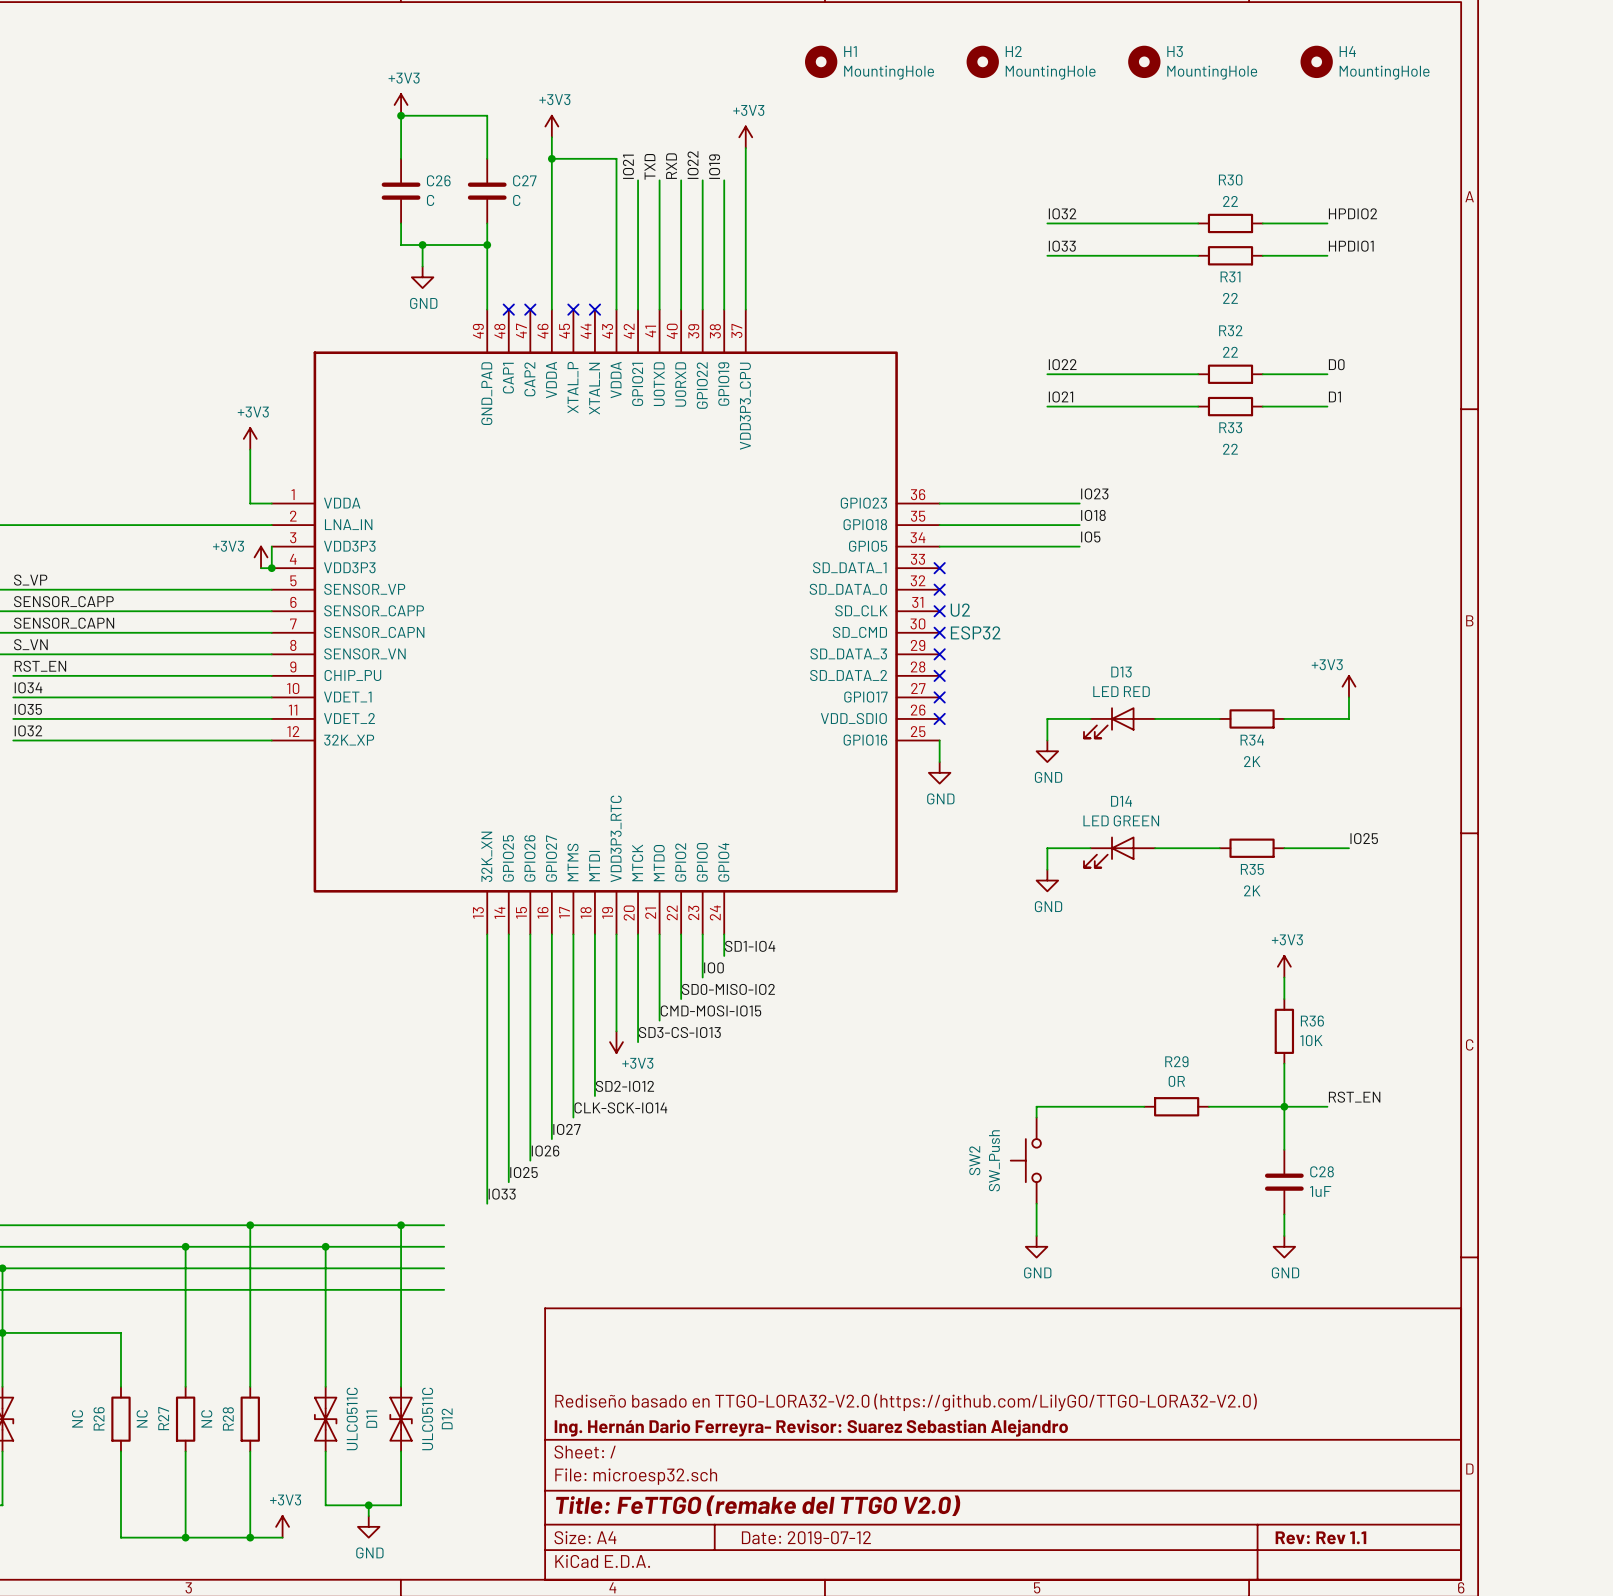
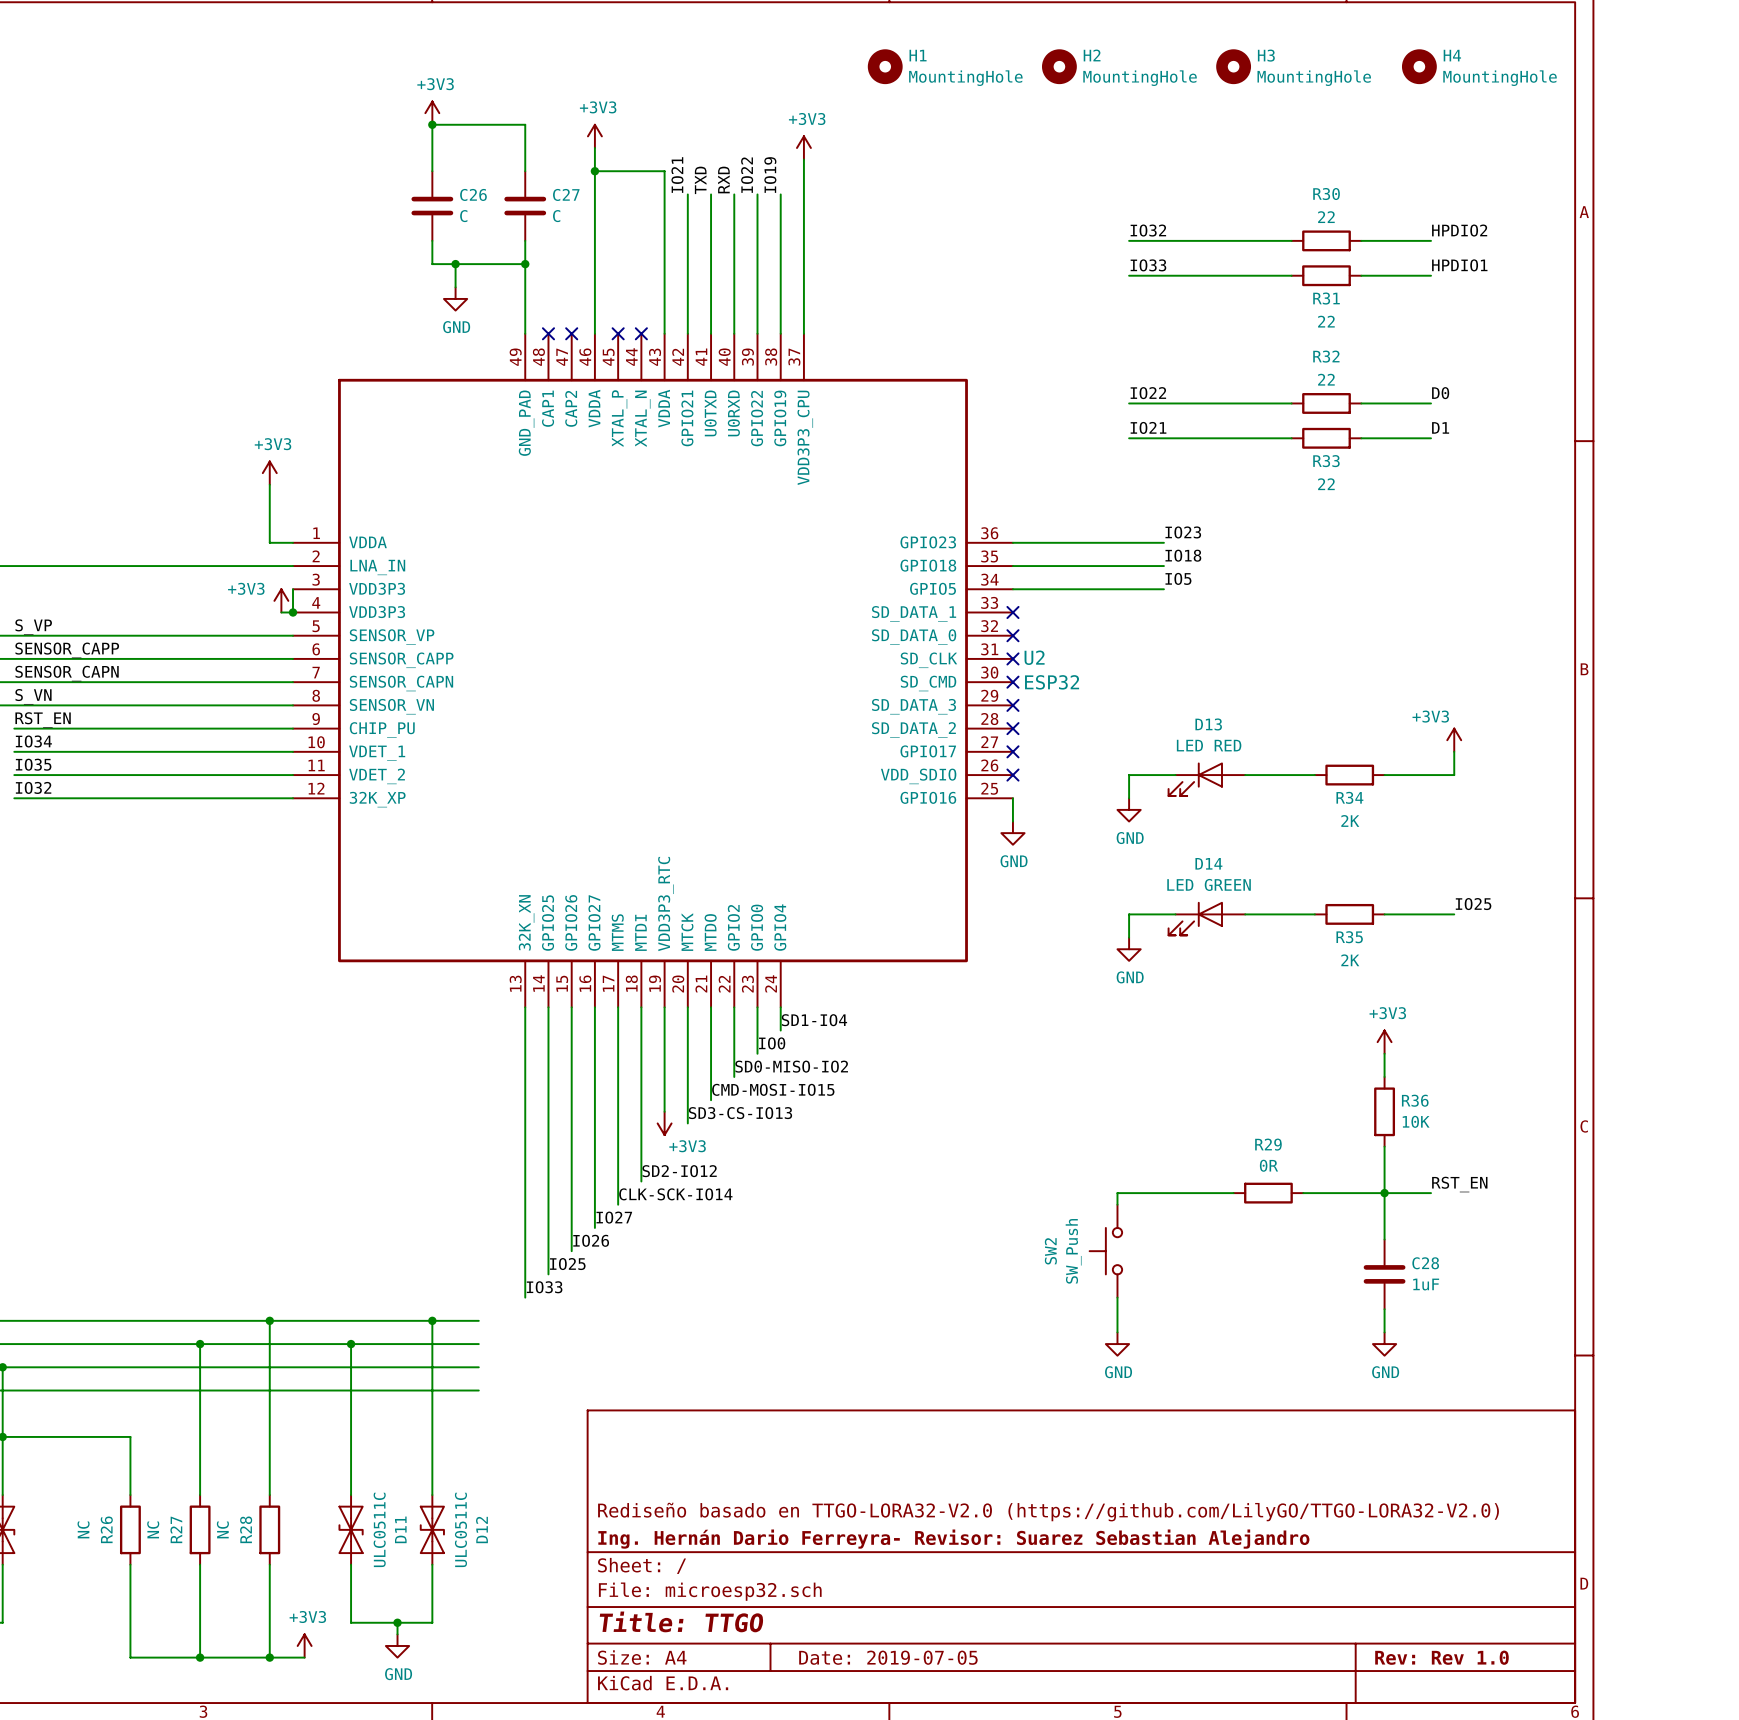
title block: Title: FeTTGO (remake del TTGO V2.0) (758, 1505) -> Title: TTGO (681, 1621)
title block: Date: 2019-07-12 (806, 1537) -> Date: 2019-07-05 (888, 1657)
title block: Rev: Rev 1.1 (1320, 1537) -> Rev: Rev 1.0 (1441, 1657)

